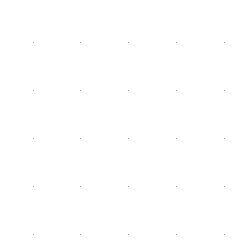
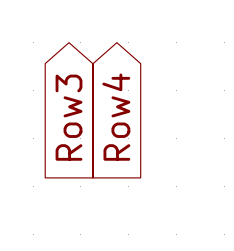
global label: none -> Row3 (69, 117)
global label: none -> Row4 (116, 117)

